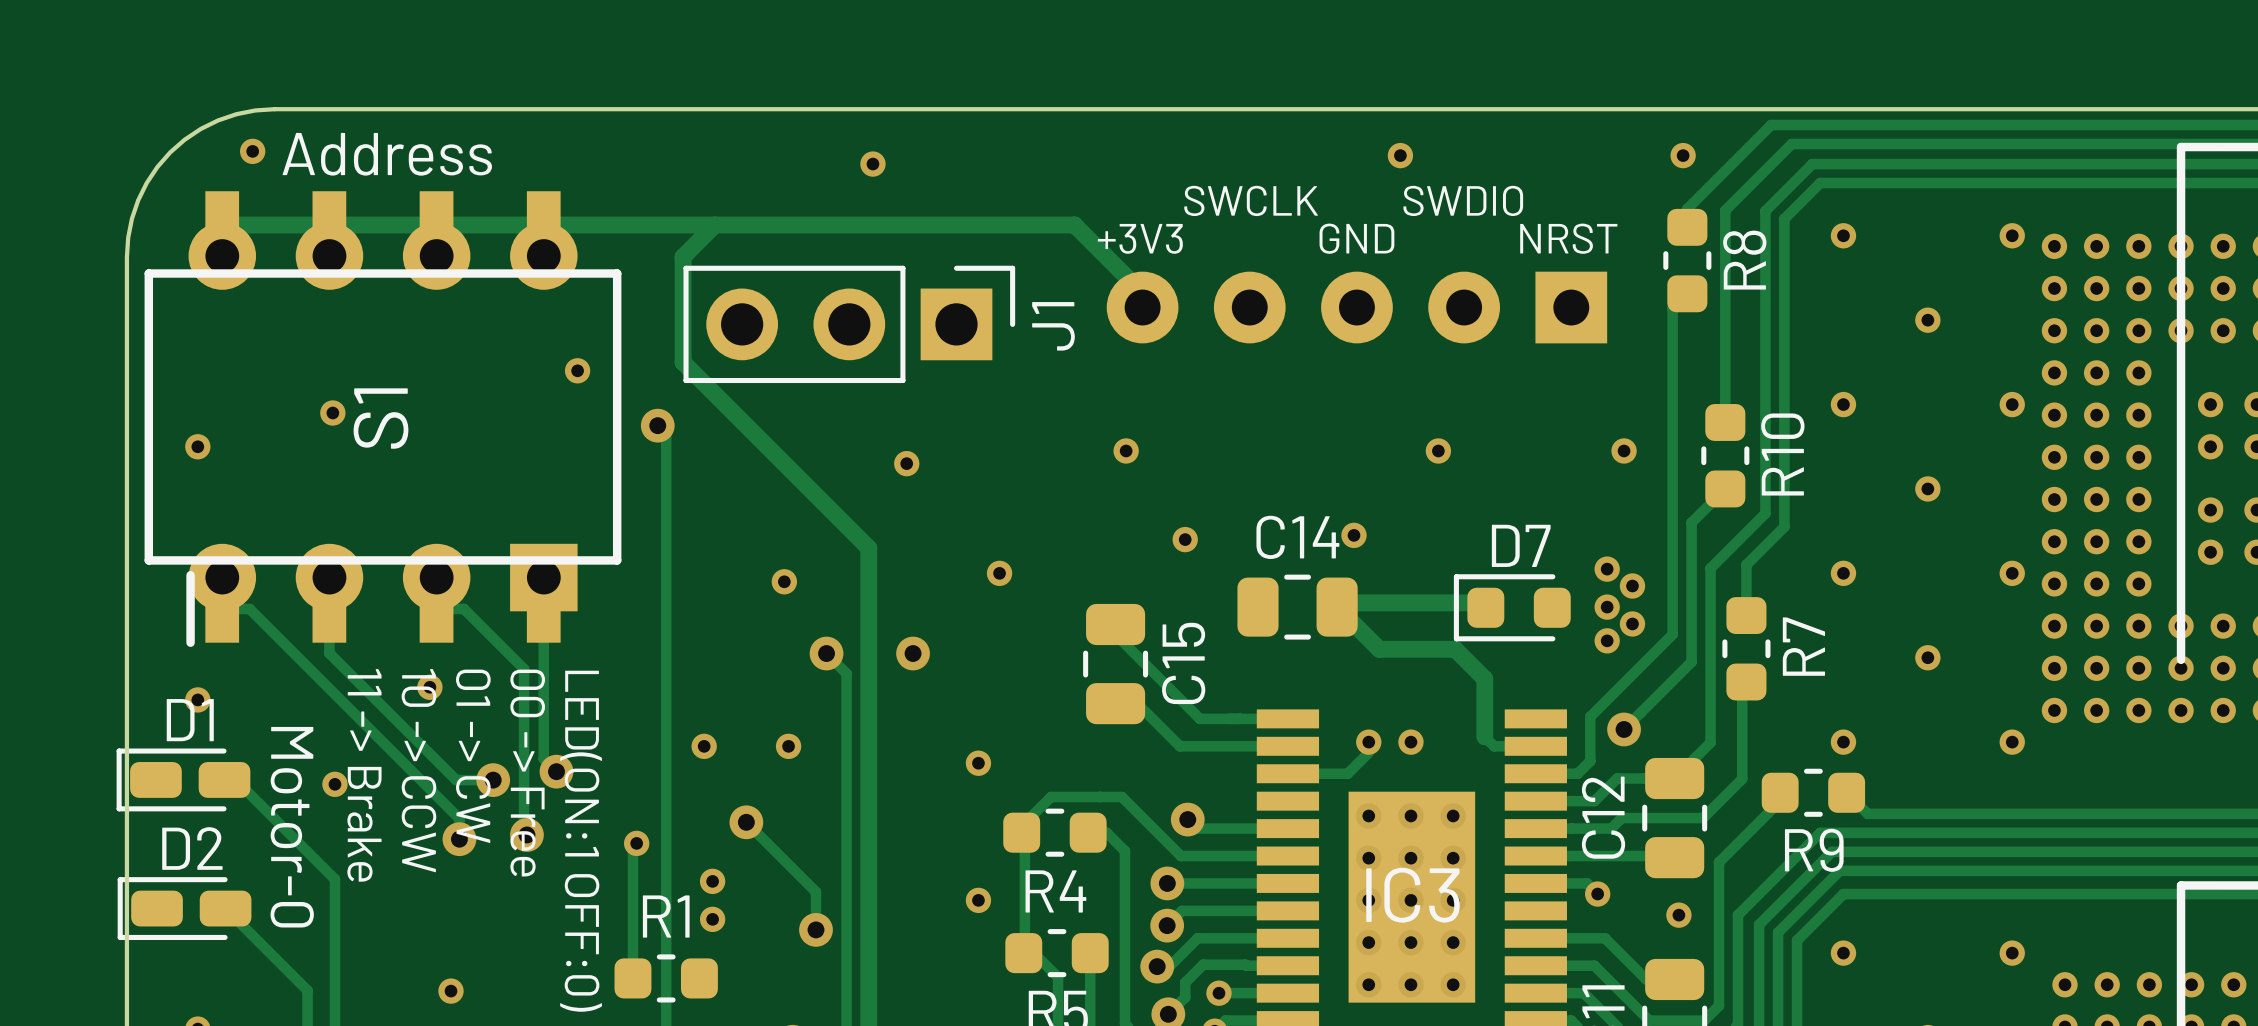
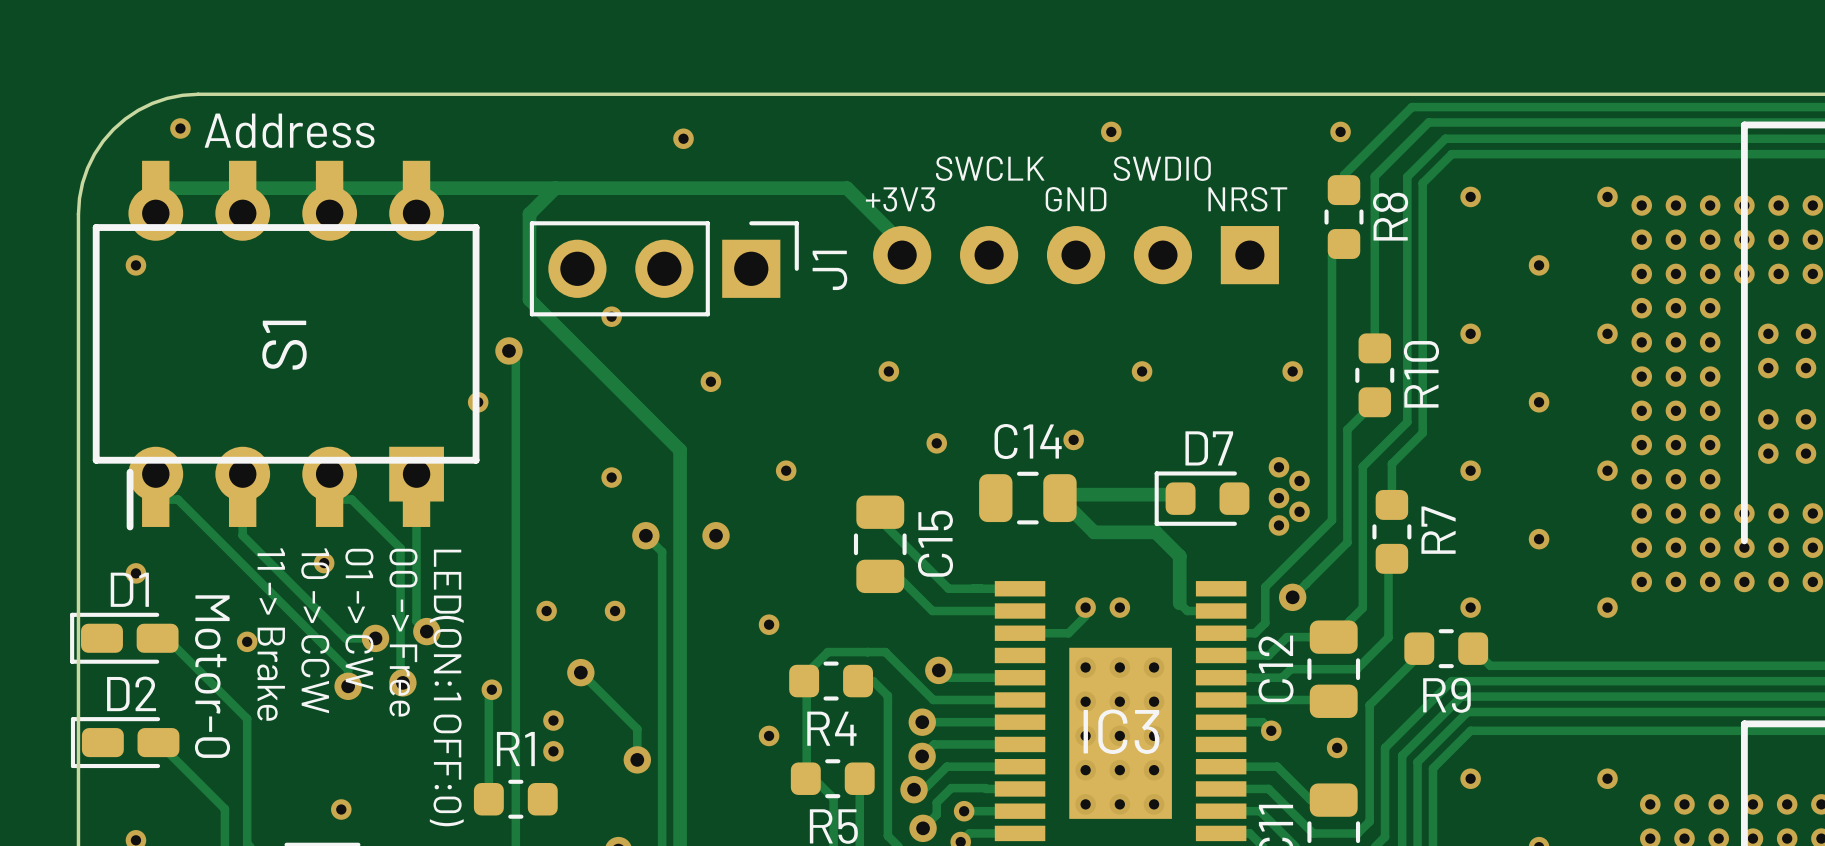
via: none -> (135, 265)
via: (577, 370) -> none
via: none -> (611, 316)
via: (332, 413) -> none
via: (197, 446) -> none
via: none -> (478, 402)

